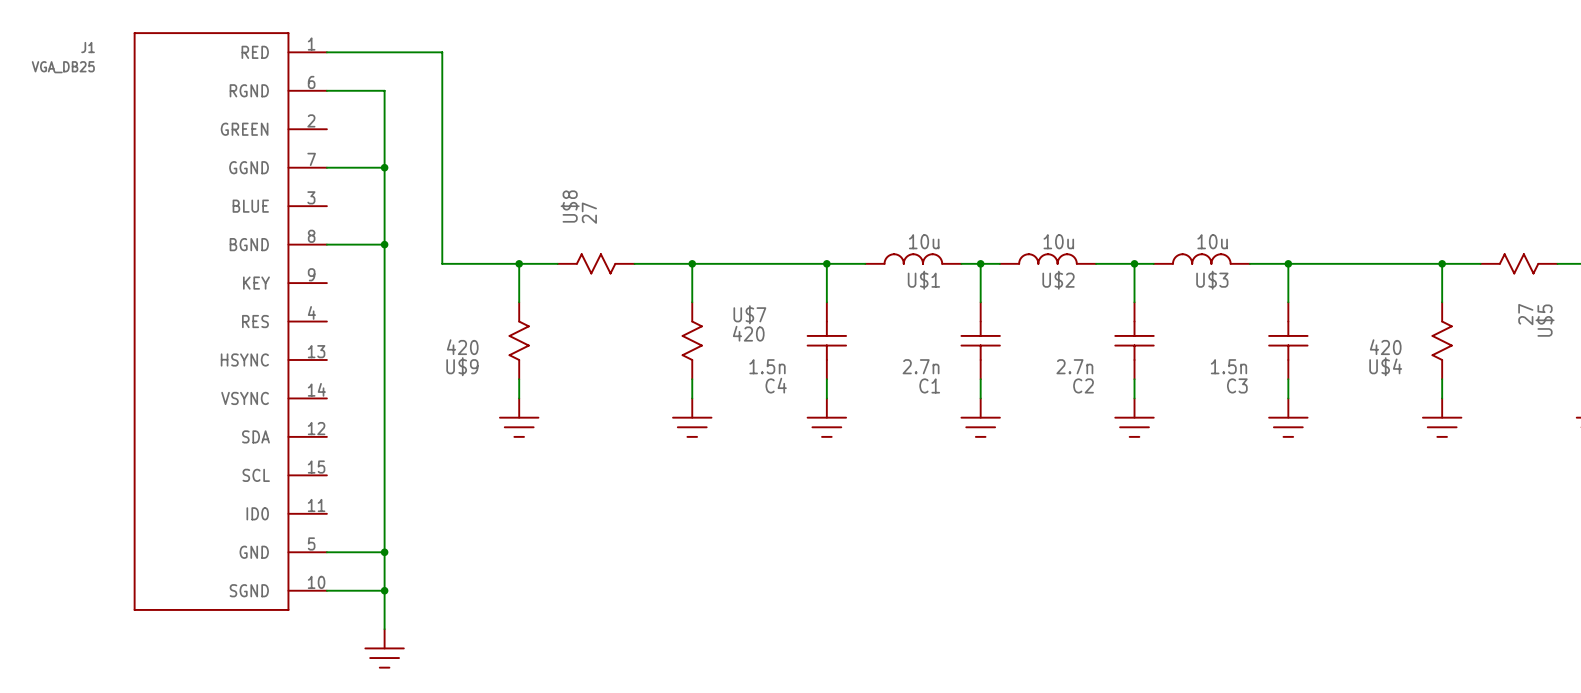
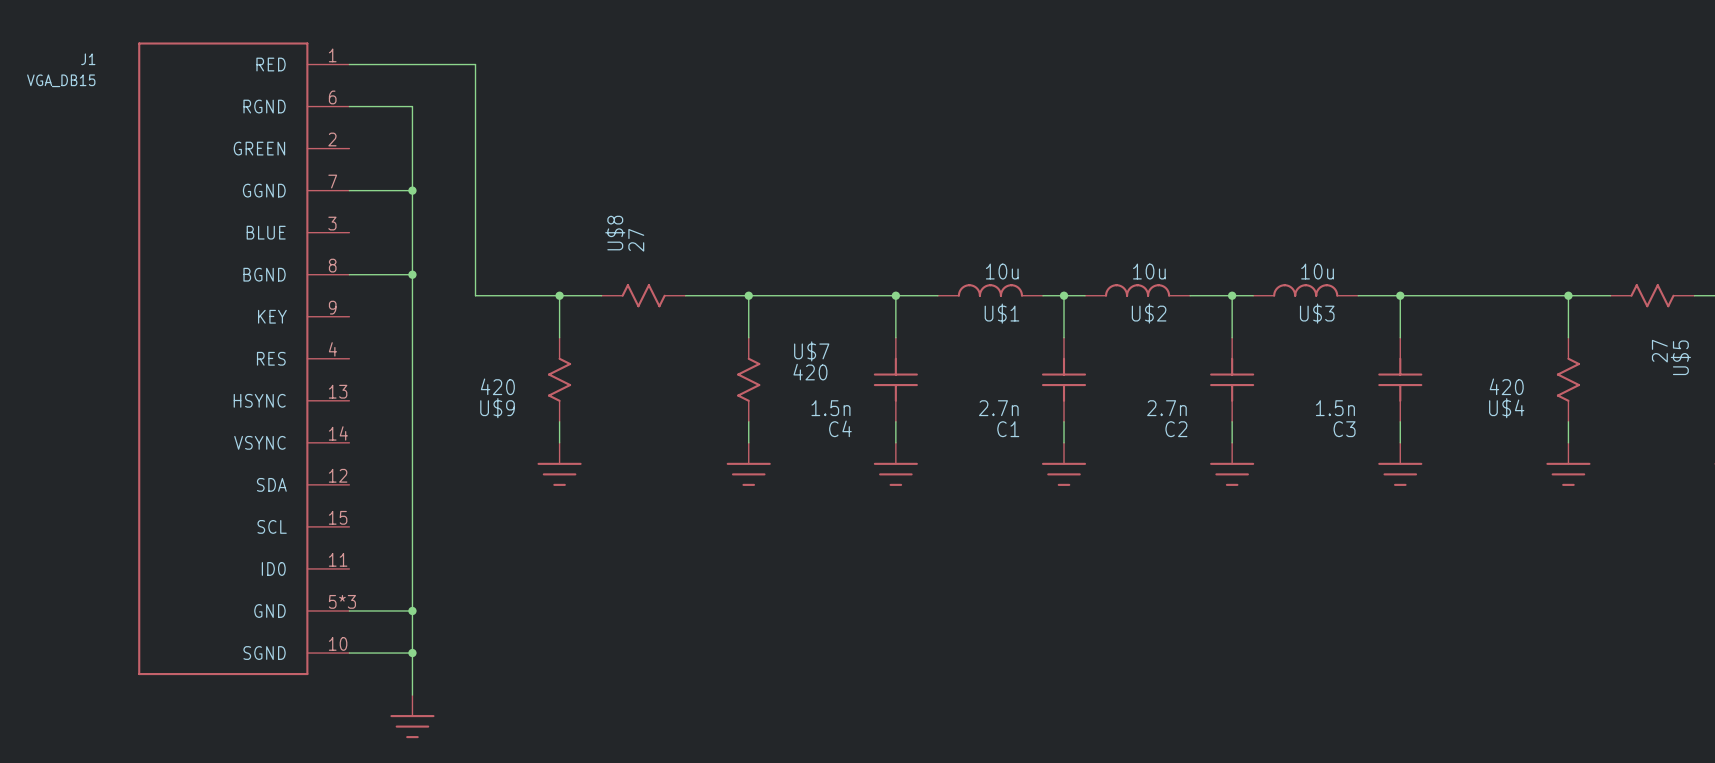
J1 value: VGA_DB25 (63, 67) -> VGA_DB15 (61, 80)
J1 pin number: 5 (311, 543) -> 5*3 (342, 601)

